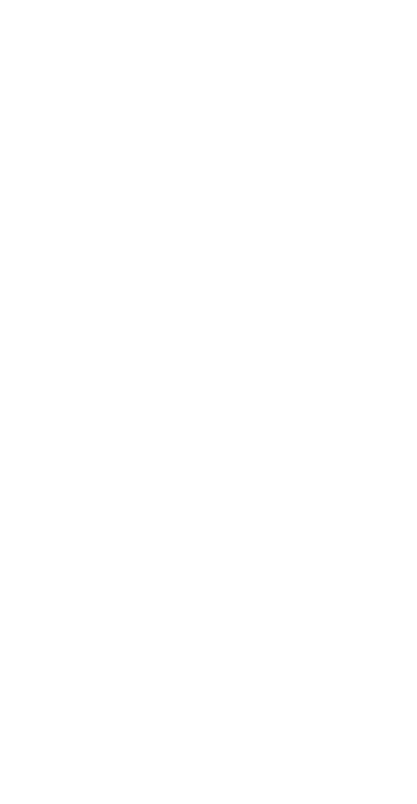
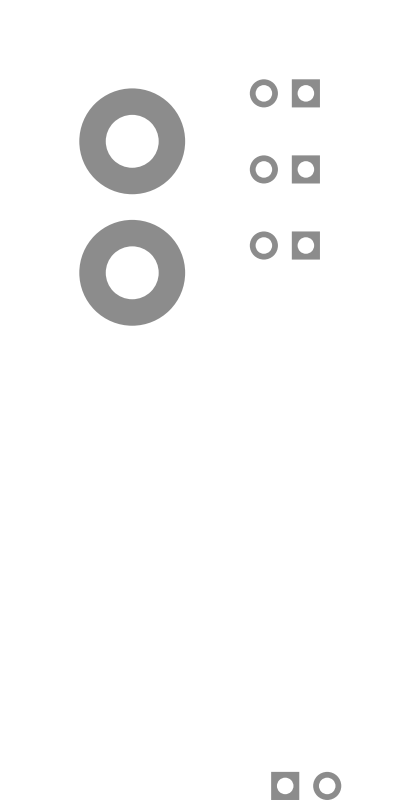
part: none -> (284, 93)
part: none -> (132, 141)
part: none -> (284, 169)
part: none -> (284, 245)
part: none -> (132, 272)
part: none -> (306, 785)

